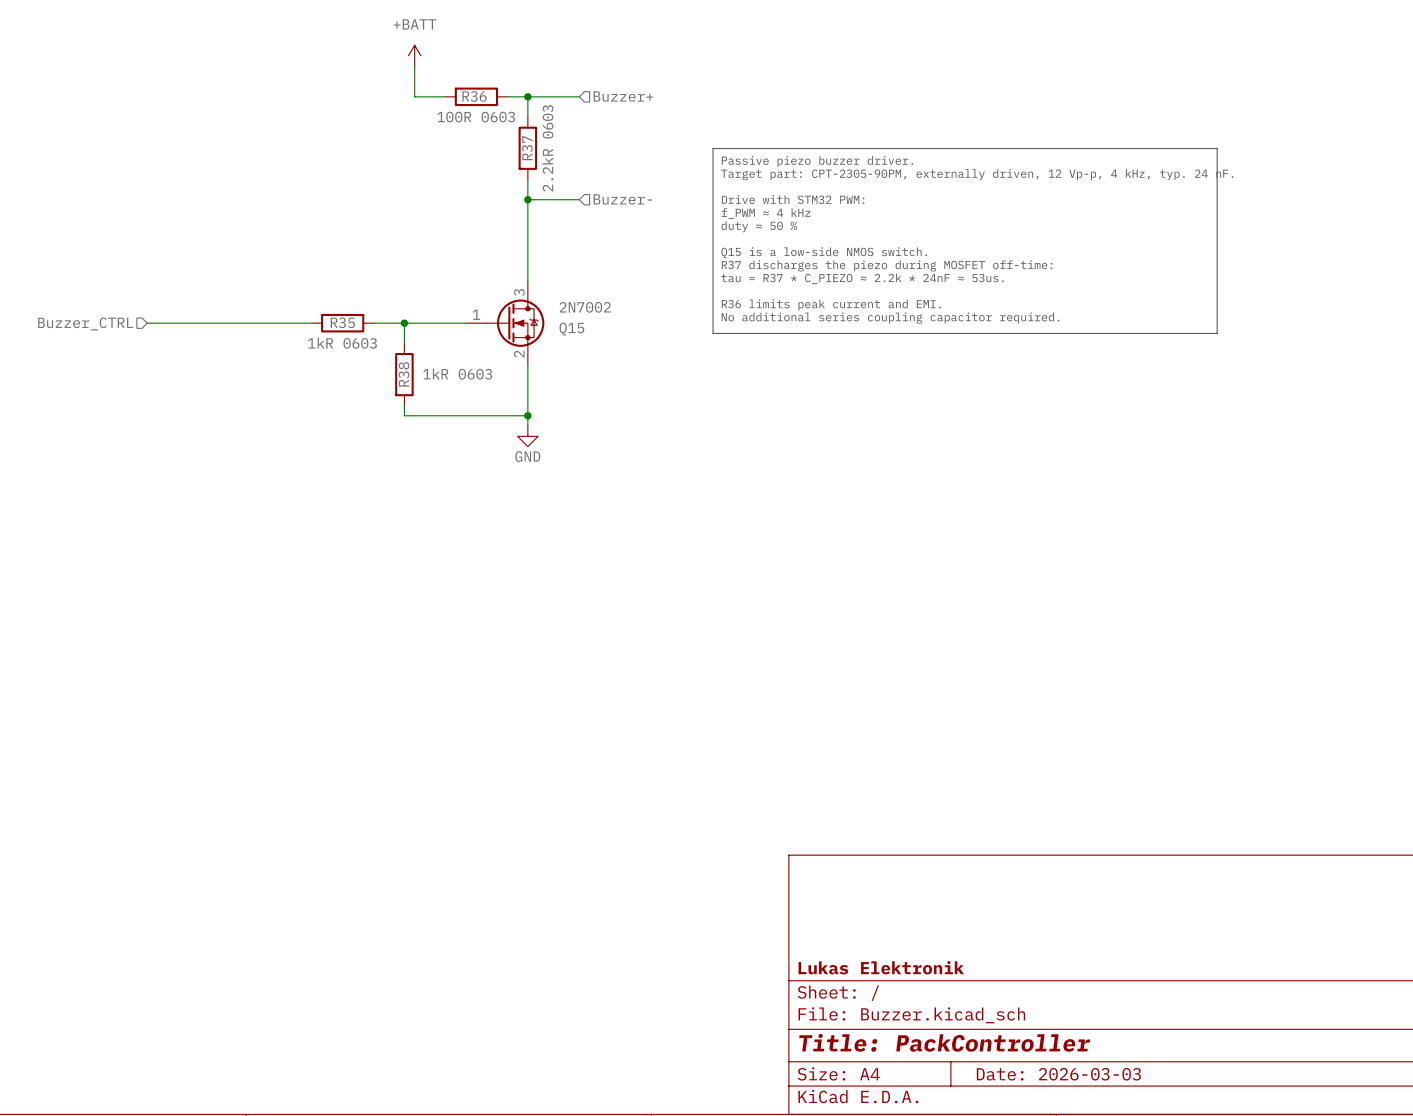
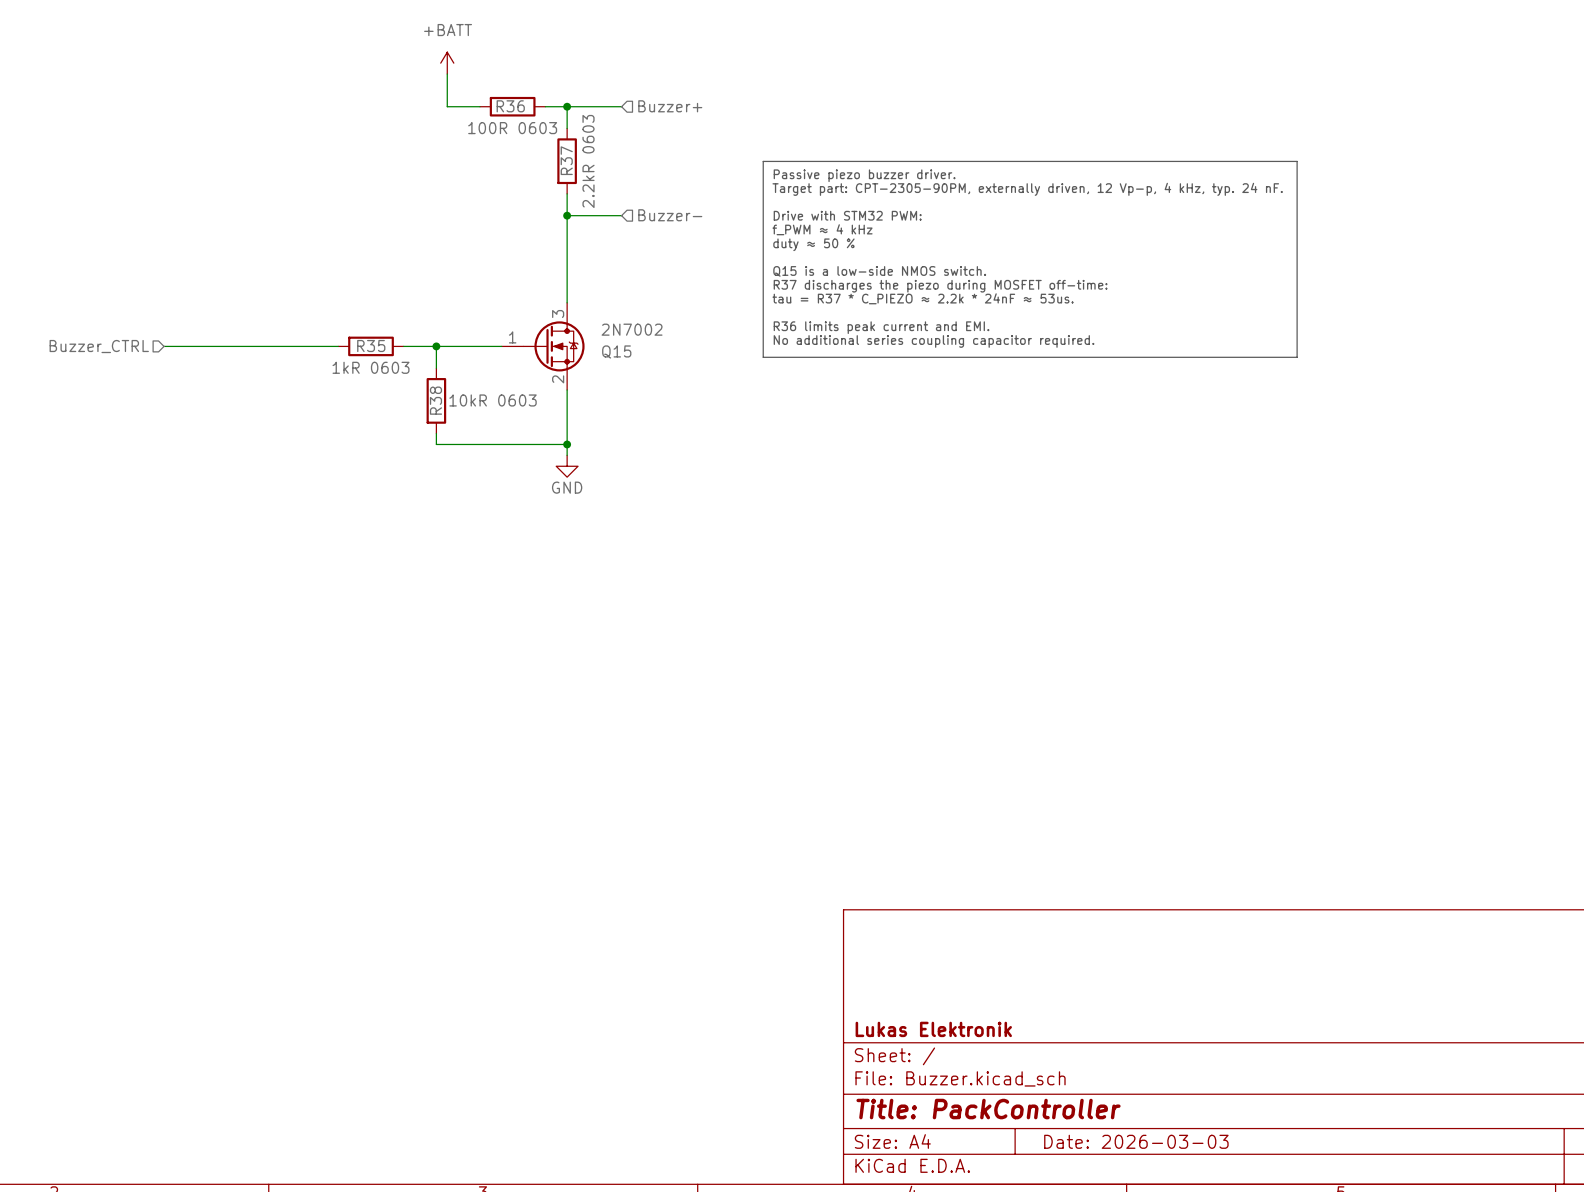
R38 value: 1kR 0603 (457, 374) -> 10kR 0603 (493, 400)

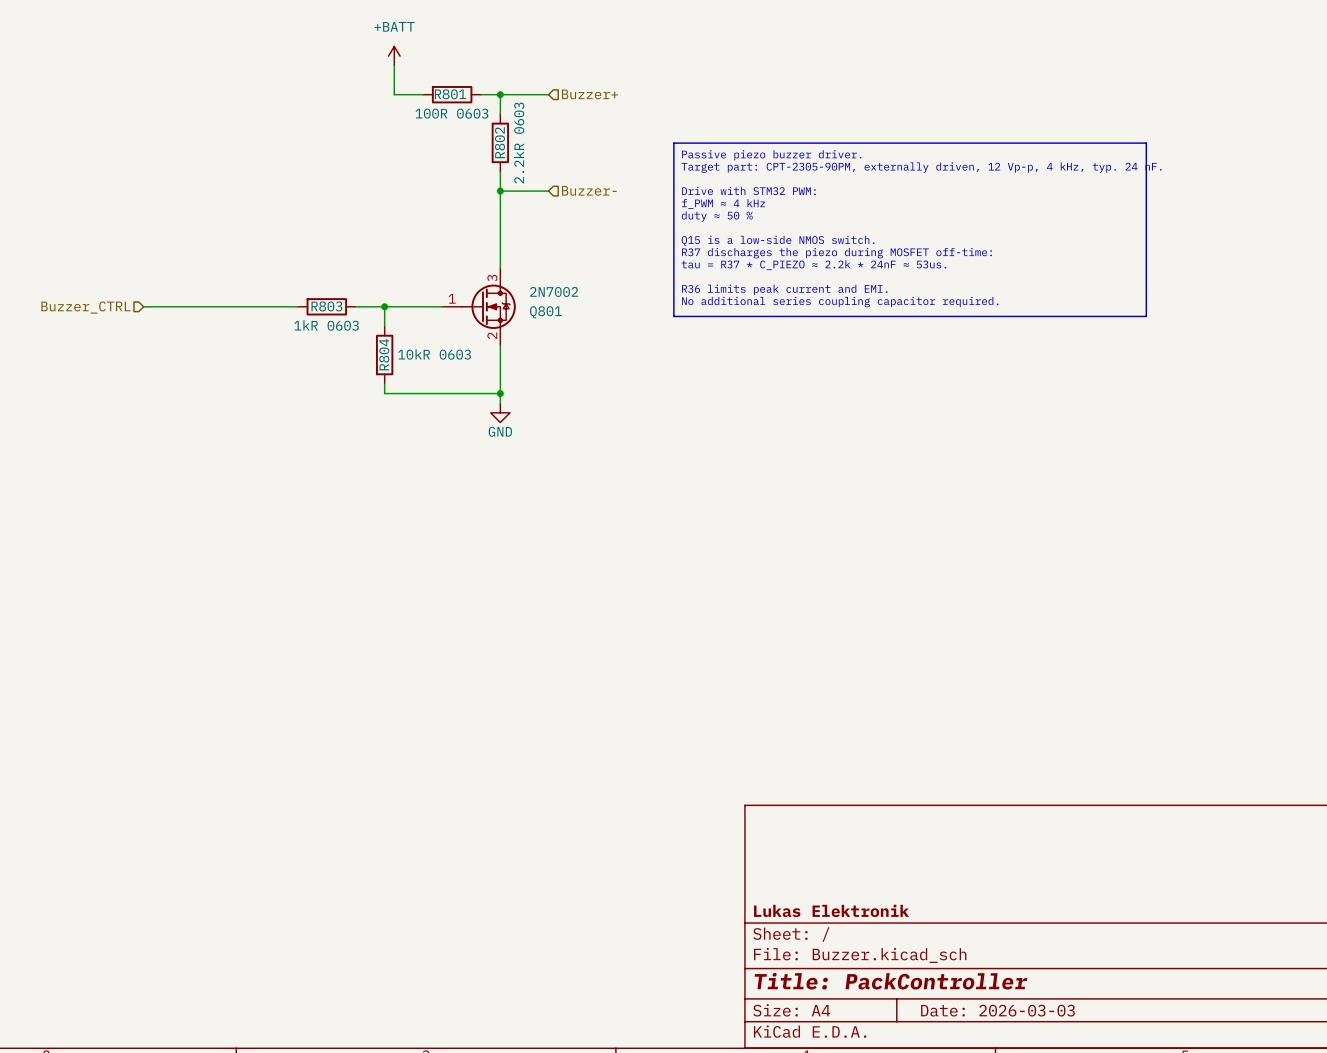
R36 name: R36 (510, 106) -> R801 (450, 94)
R37 name: R37 (566, 160) -> R802 (499, 142)
R35 name: R35 (371, 346) -> R803 (326, 306)
Q15 name: Q15 (616, 351) -> Q801 (545, 312)
R38 name: R38 (435, 400) -> R804 (384, 354)

